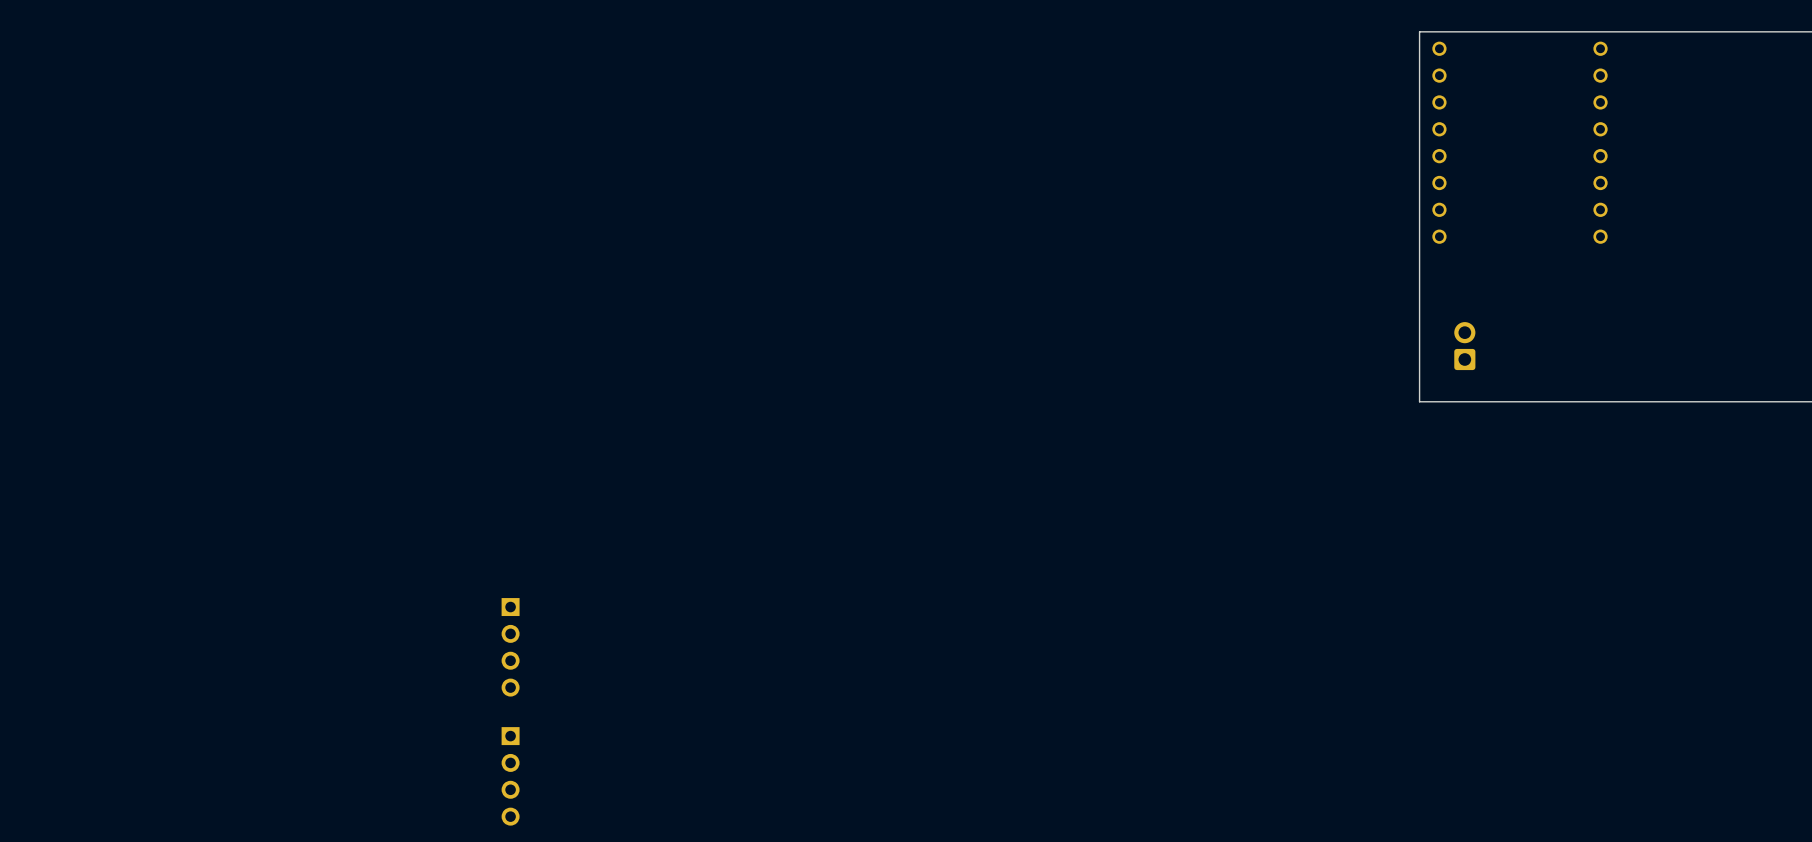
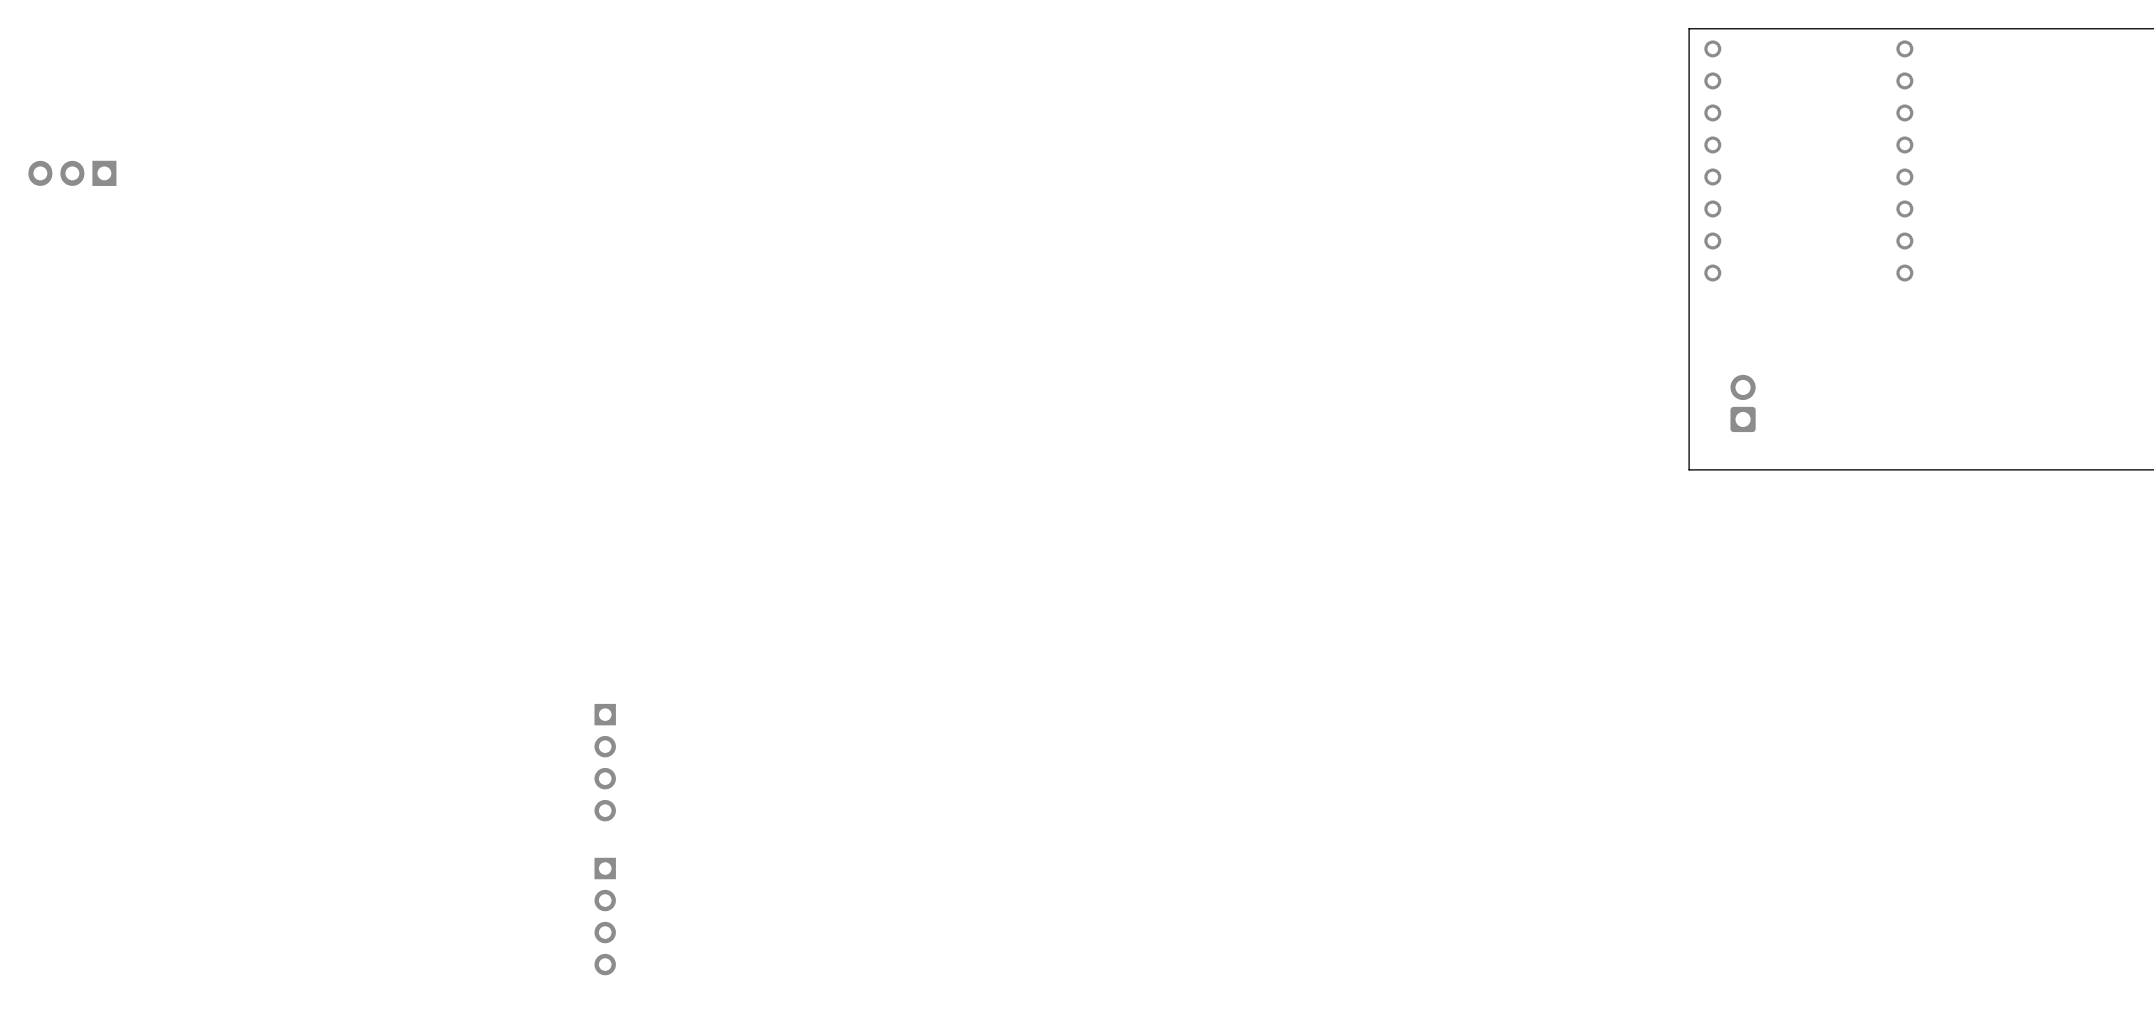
part: none -> (72, 173)

